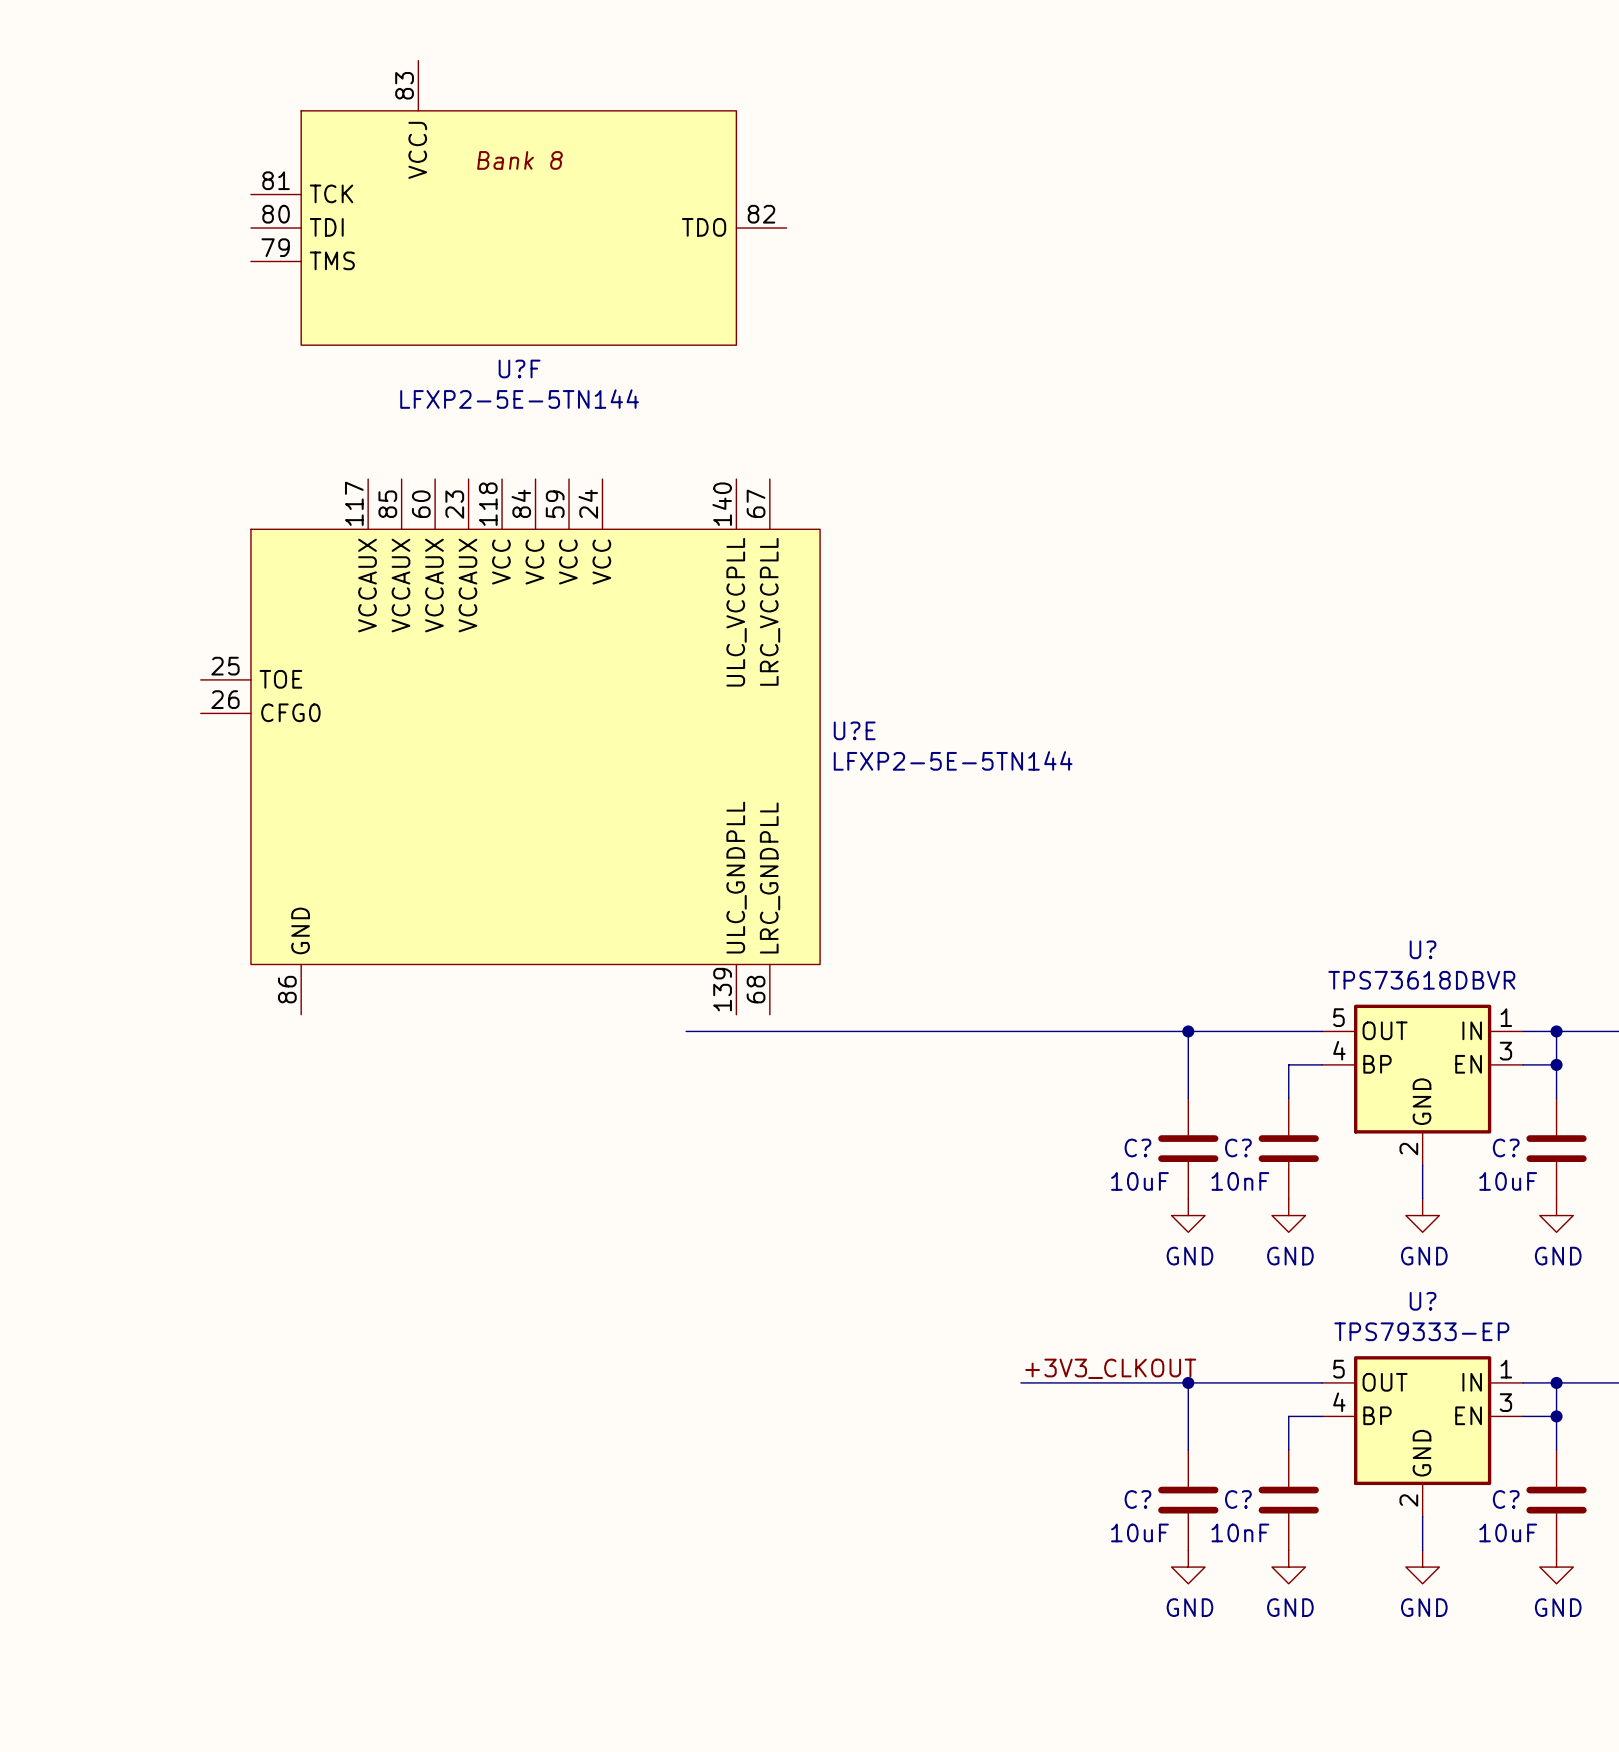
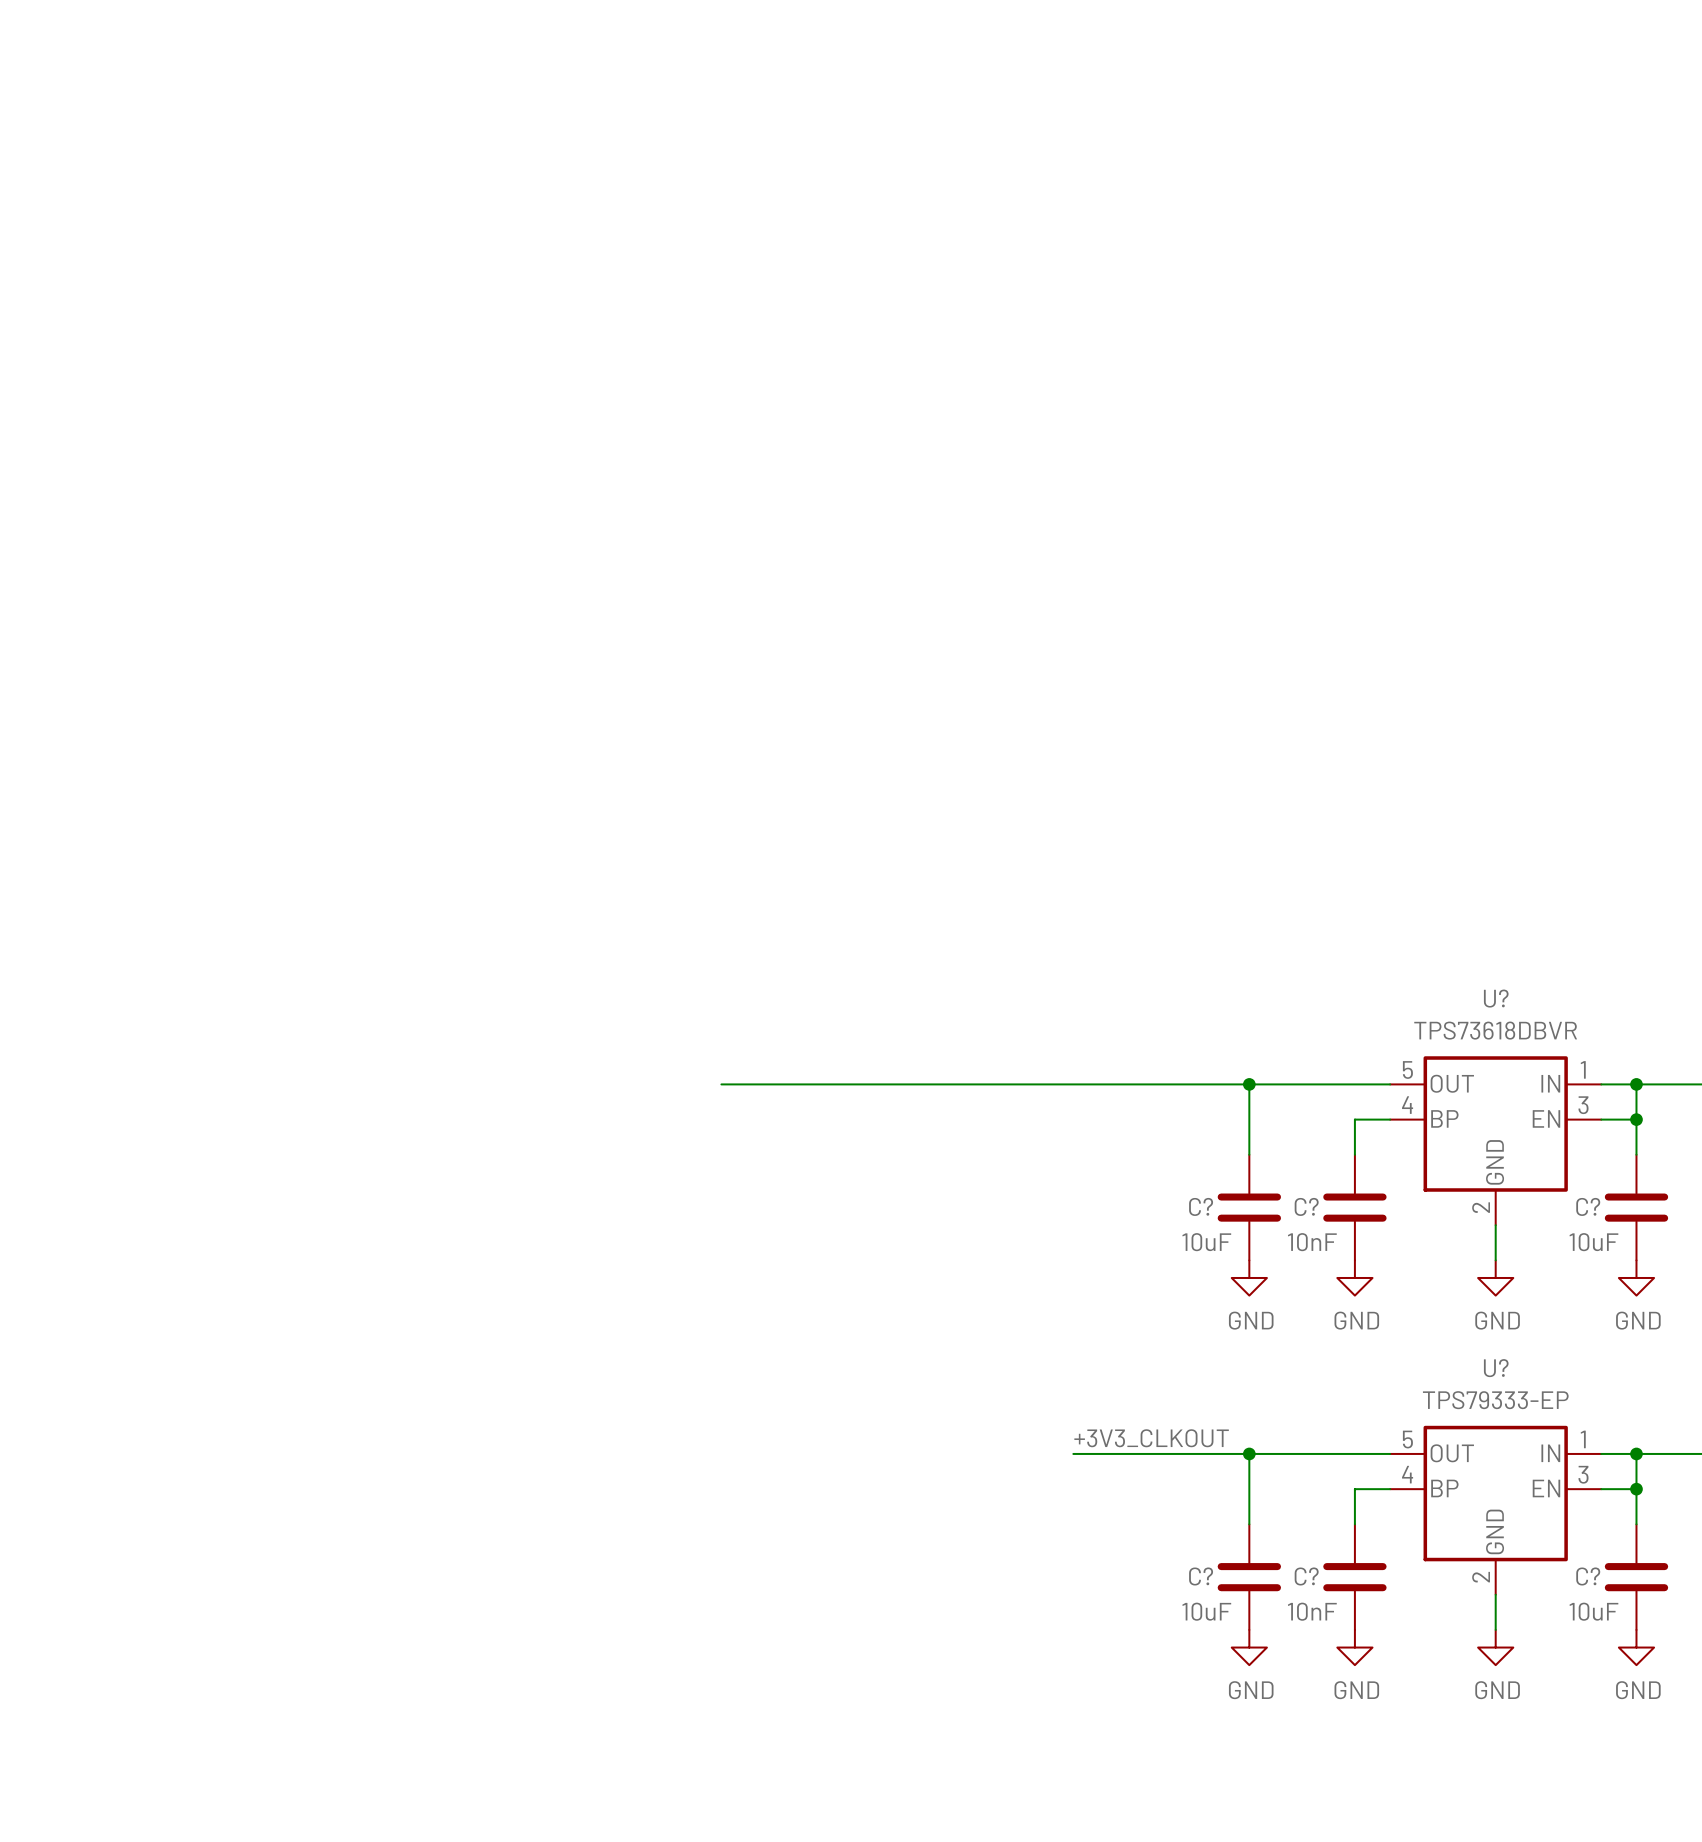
U?F: LFXP2-5E-5TN144 (518, 202) -> none
U?E: LFXP2-5E-5TN144 (510, 746) -> none

